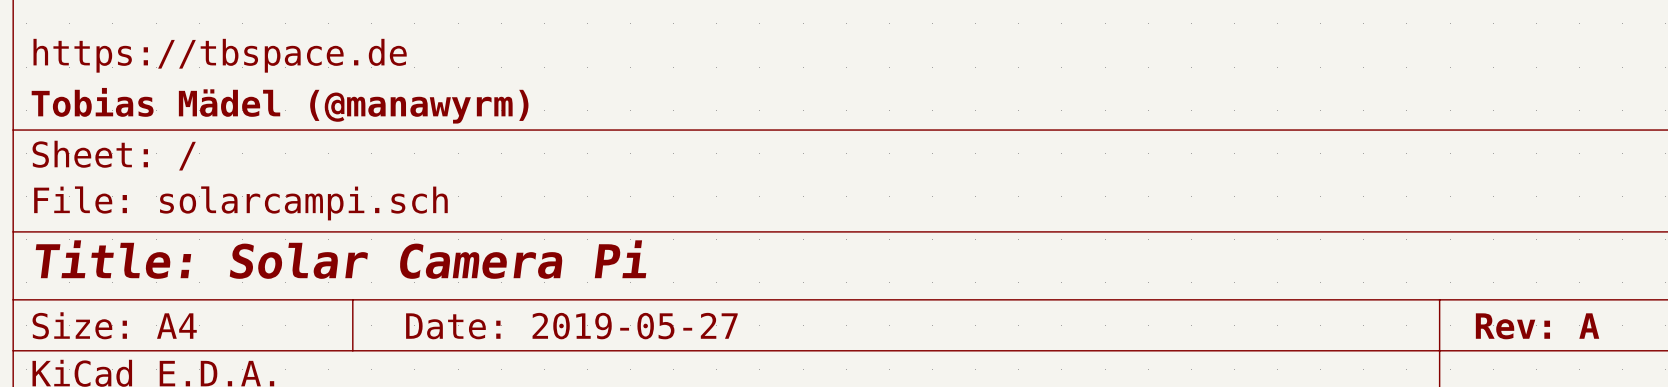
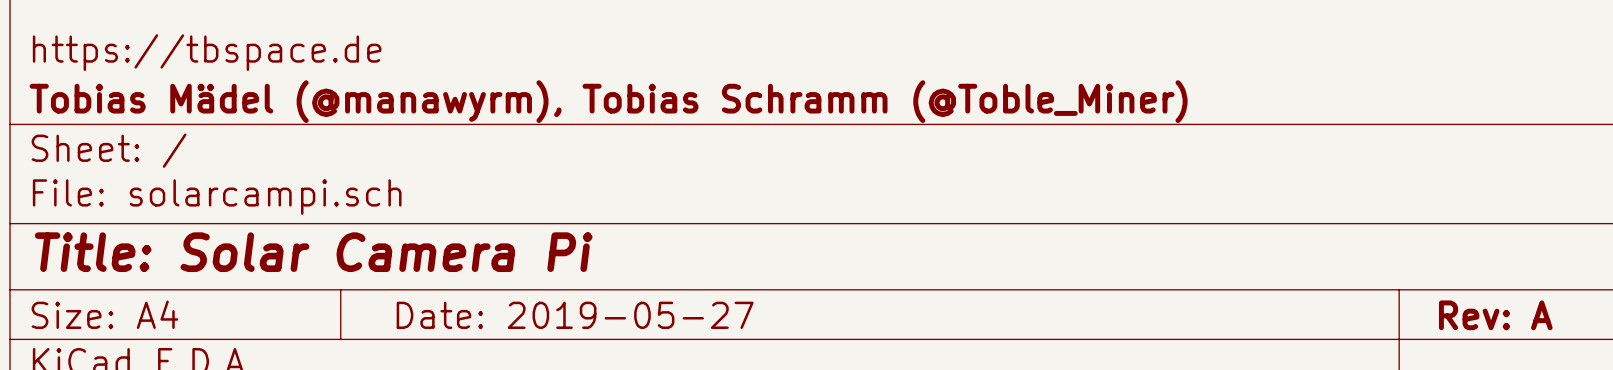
title block: Tobias Mädel (@manawyrm) (280, 105) -> Tobias Mädel (@manawyrm), Tobias Schramm (@Toble_Miner) (608, 101)

